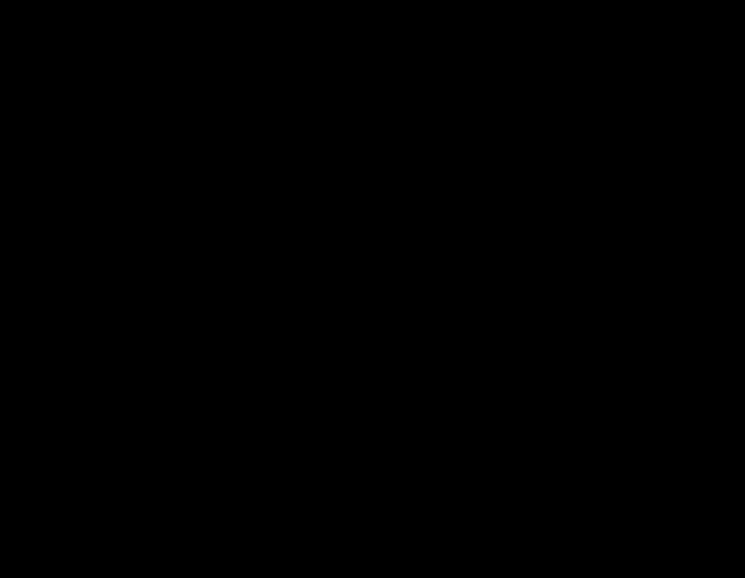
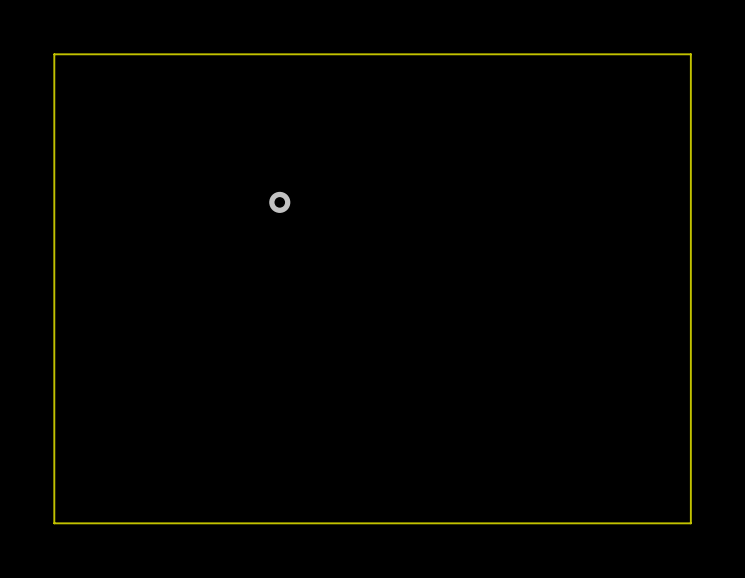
board edge: none -> (690, 54) (54, 54) (54, 523) (690, 523) (690, 54)
via: none -> (279, 202)

